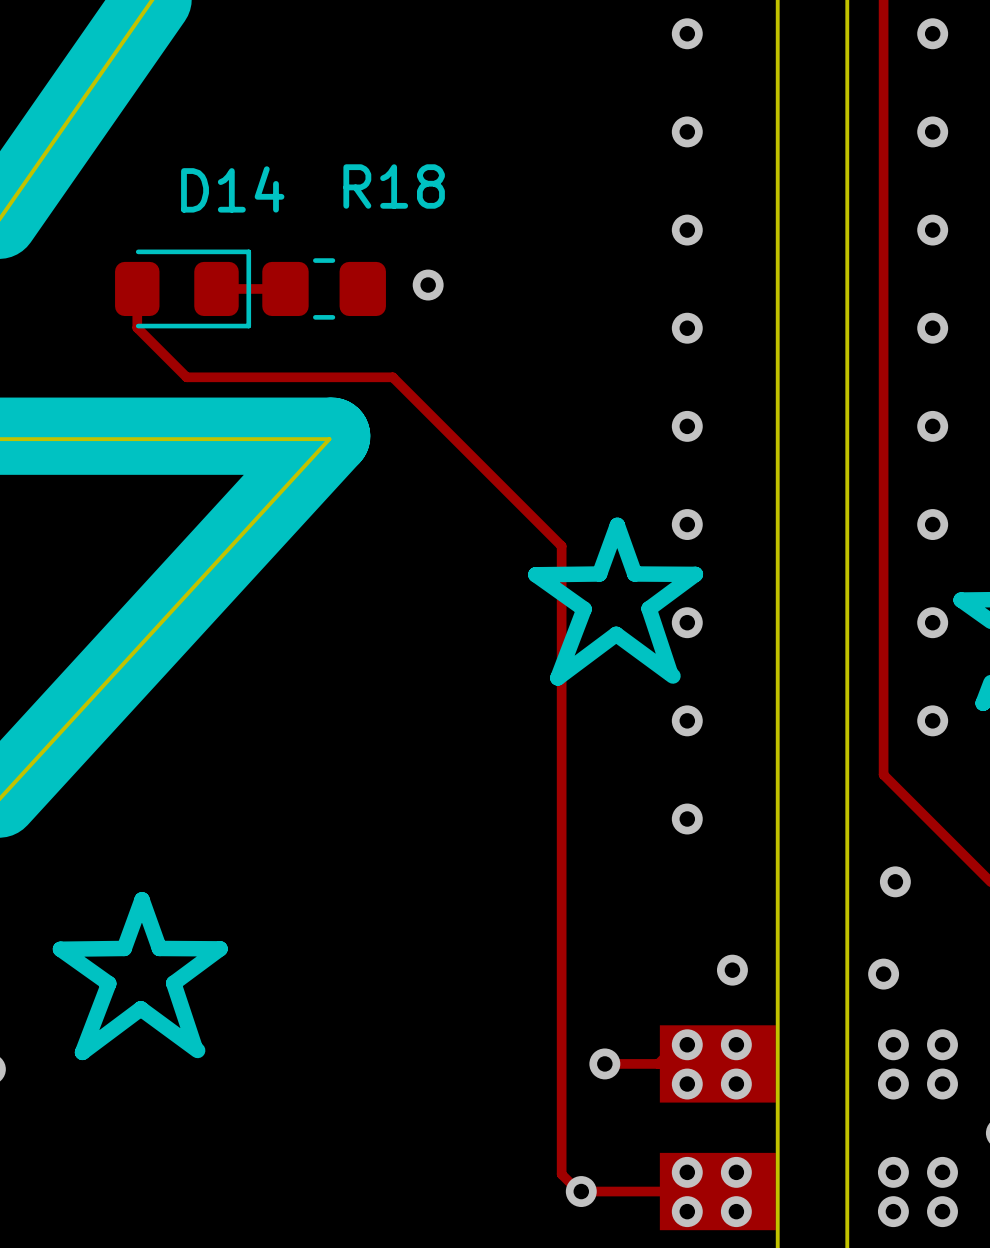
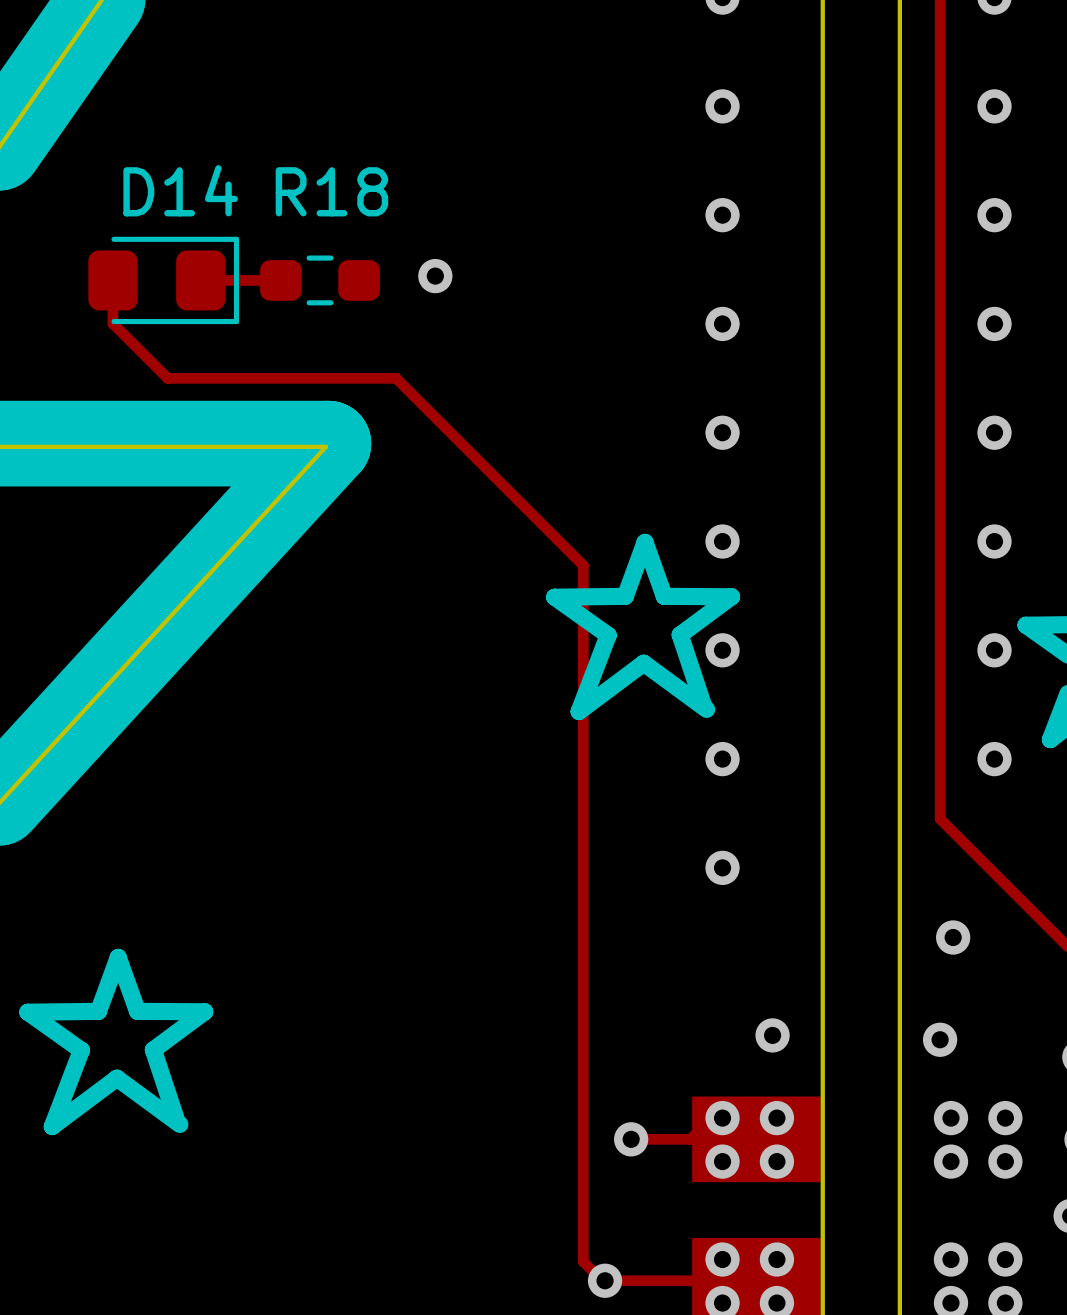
R18 name position: R18 (394, 186) -> R18 (331, 191)
D14 name position: D14 (232, 189) -> D14 (180, 190)
R18 footprint: [262, 258, 386, 320] -> [260, 255, 380, 306]

